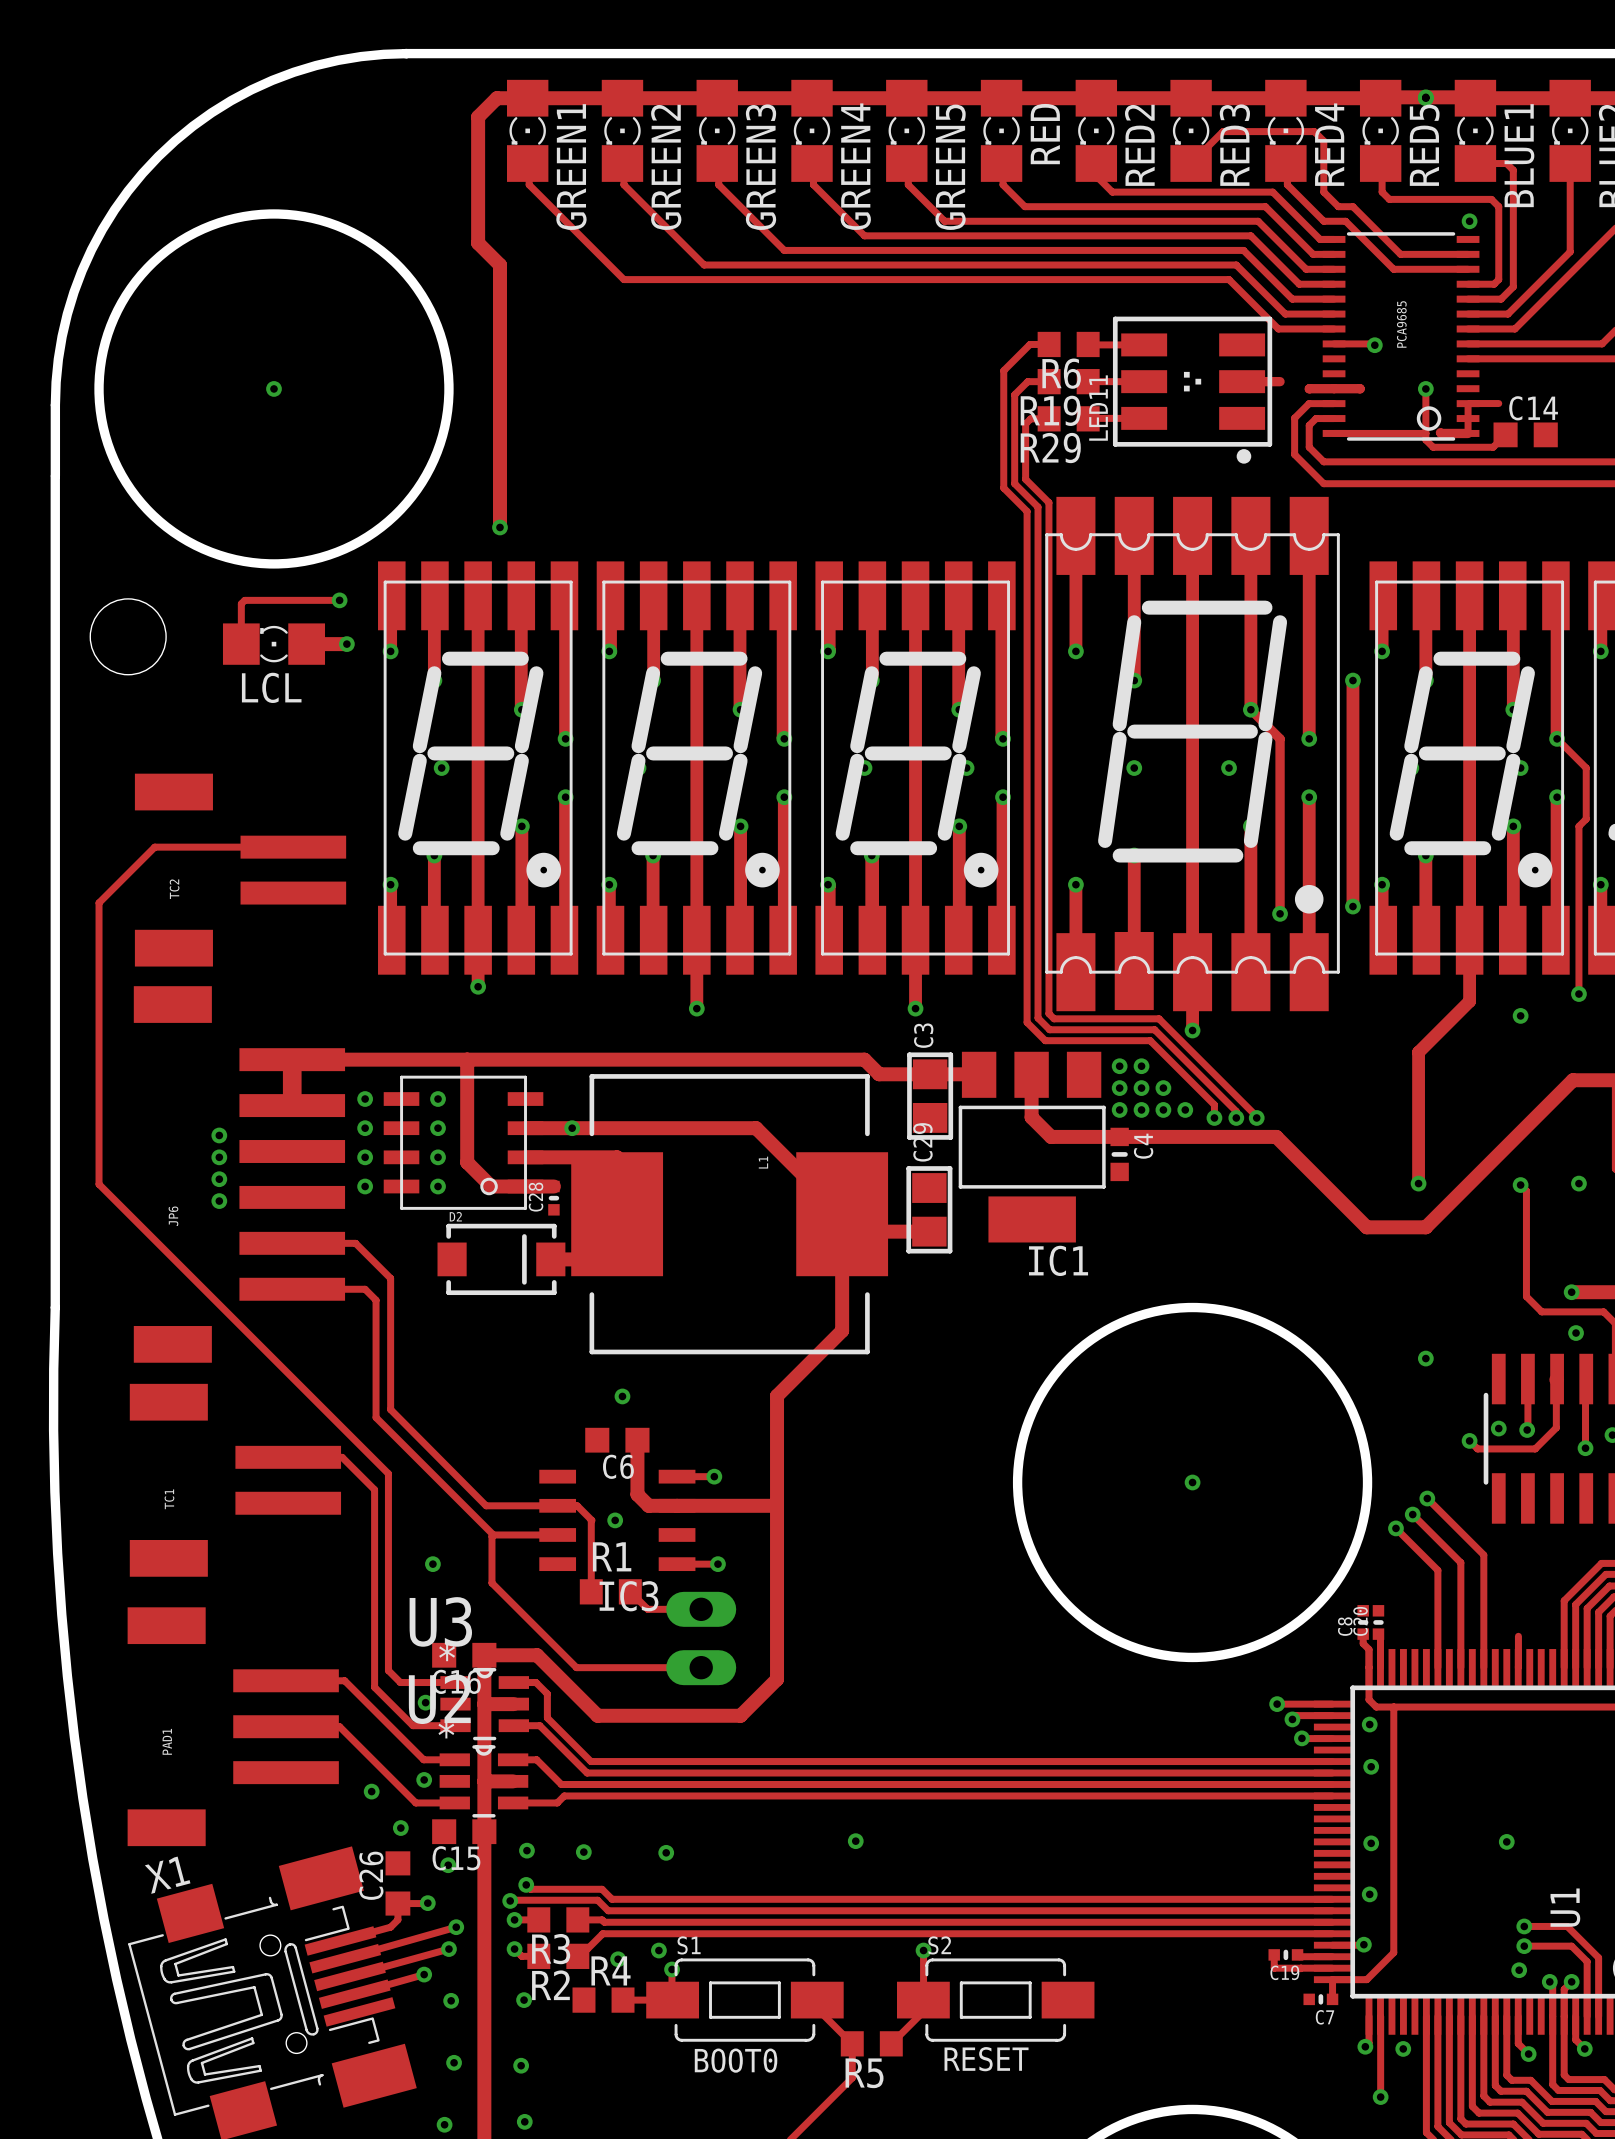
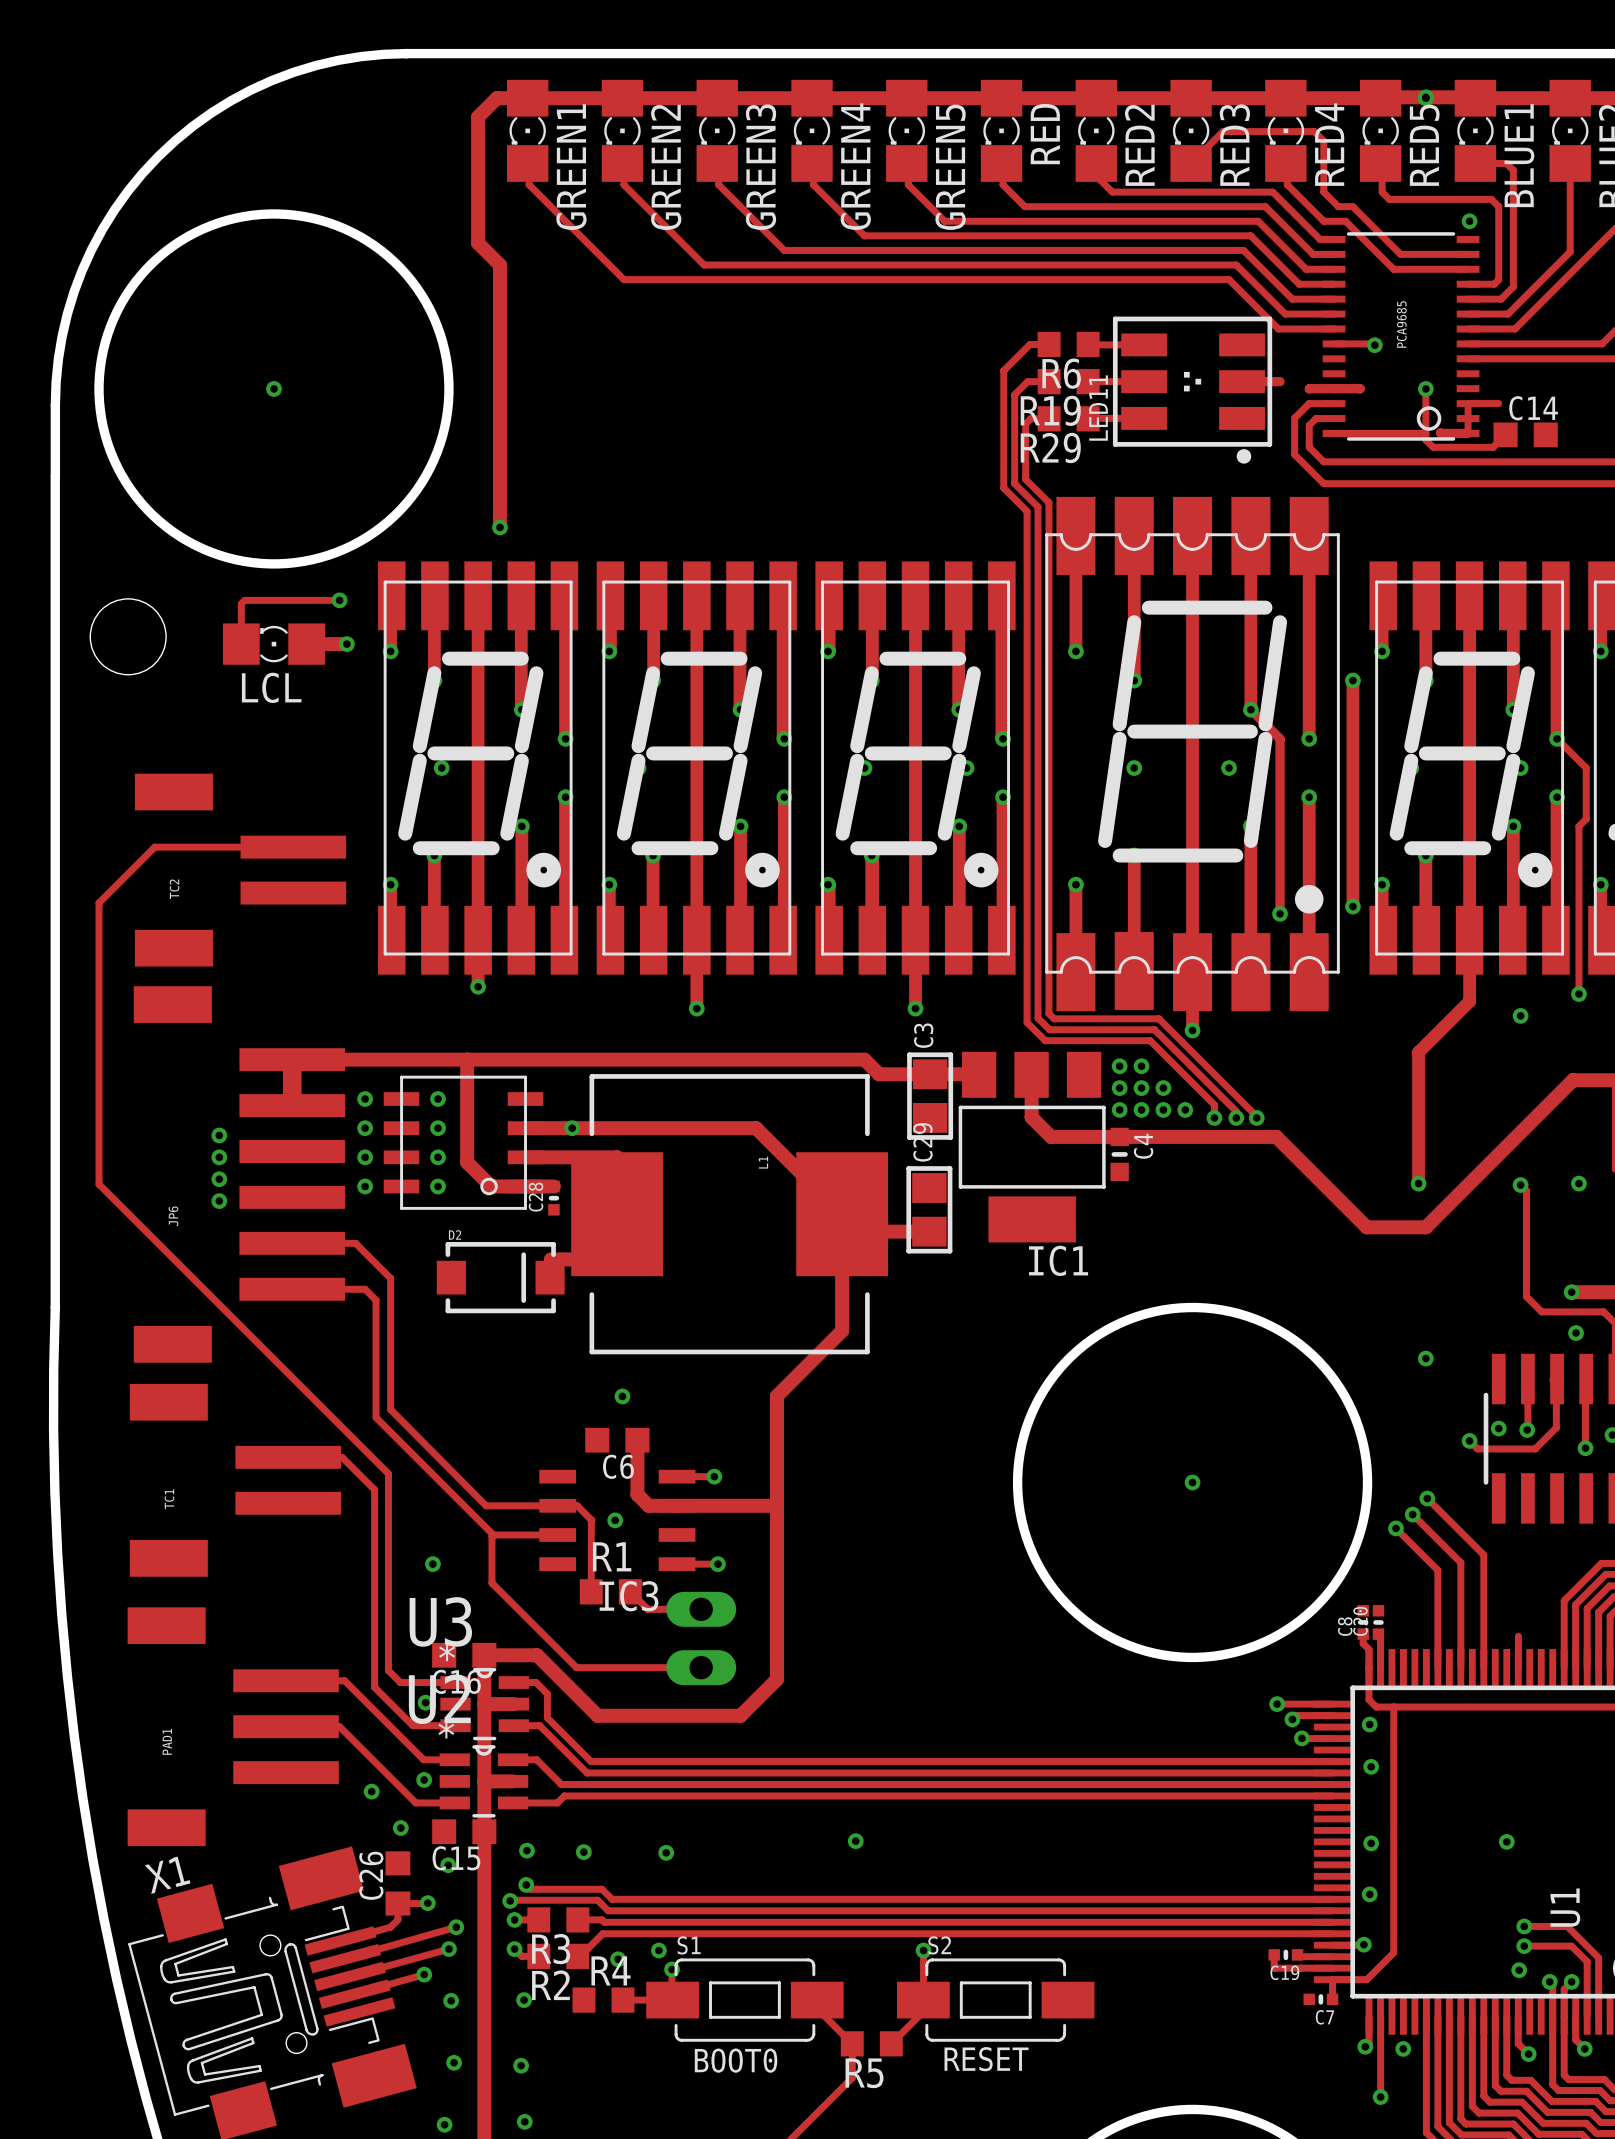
D2 position: (501, 1259) -> (500, 1277)

